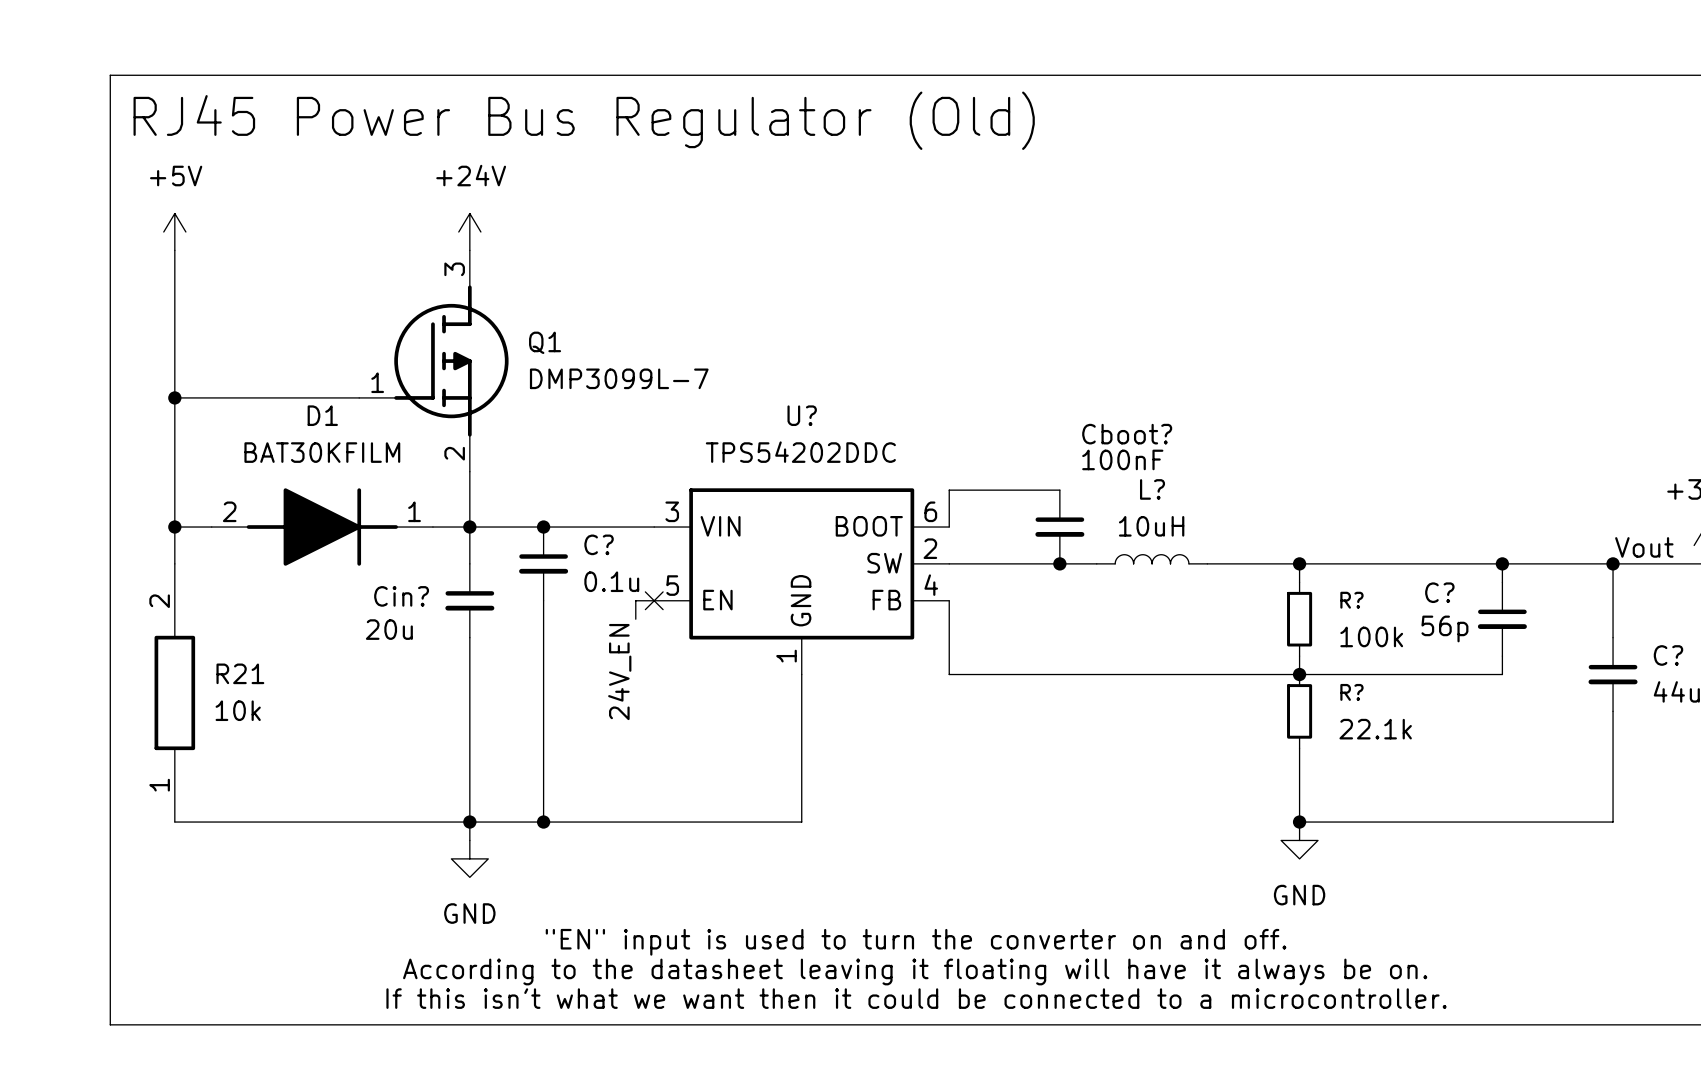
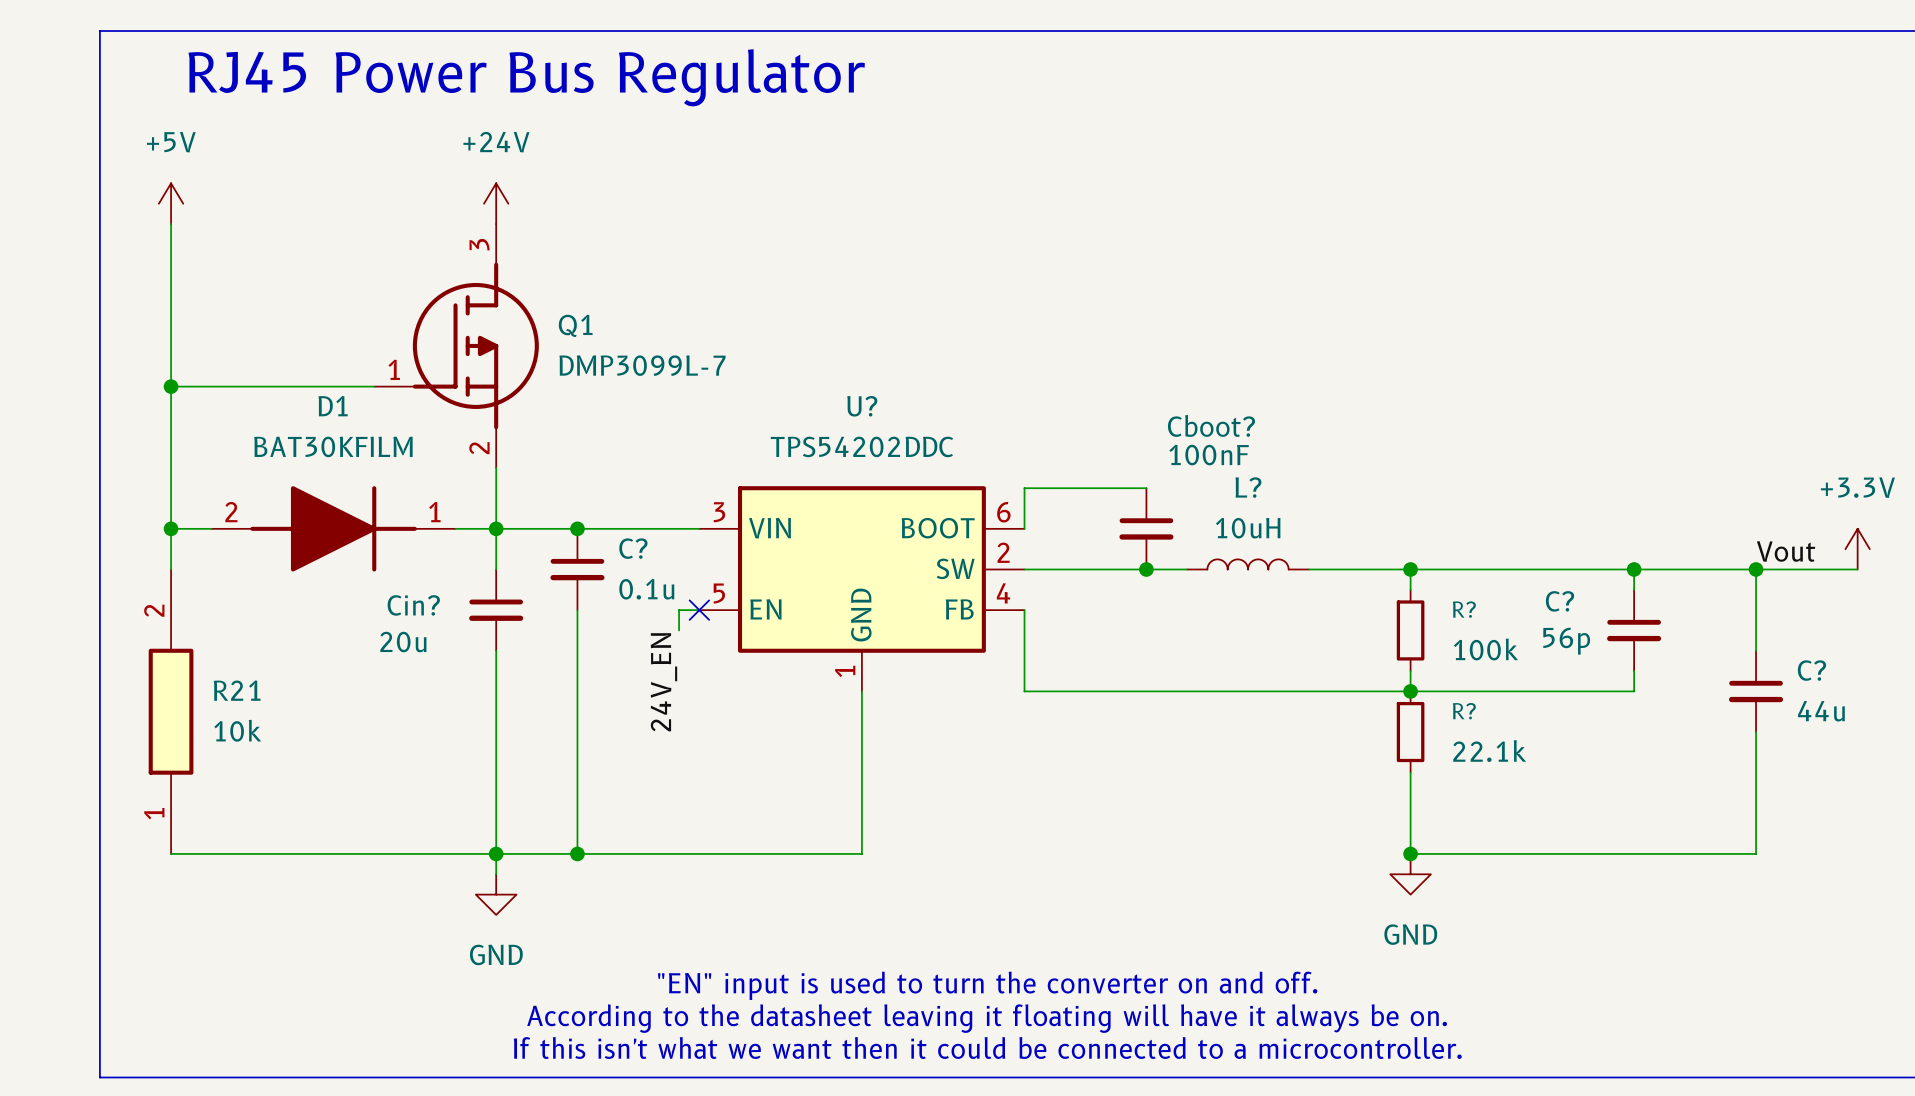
text: RJ45 Power Bus Regulator (Old) (584, 120) -> RJ45 Power Bus Regulator (526, 77)

